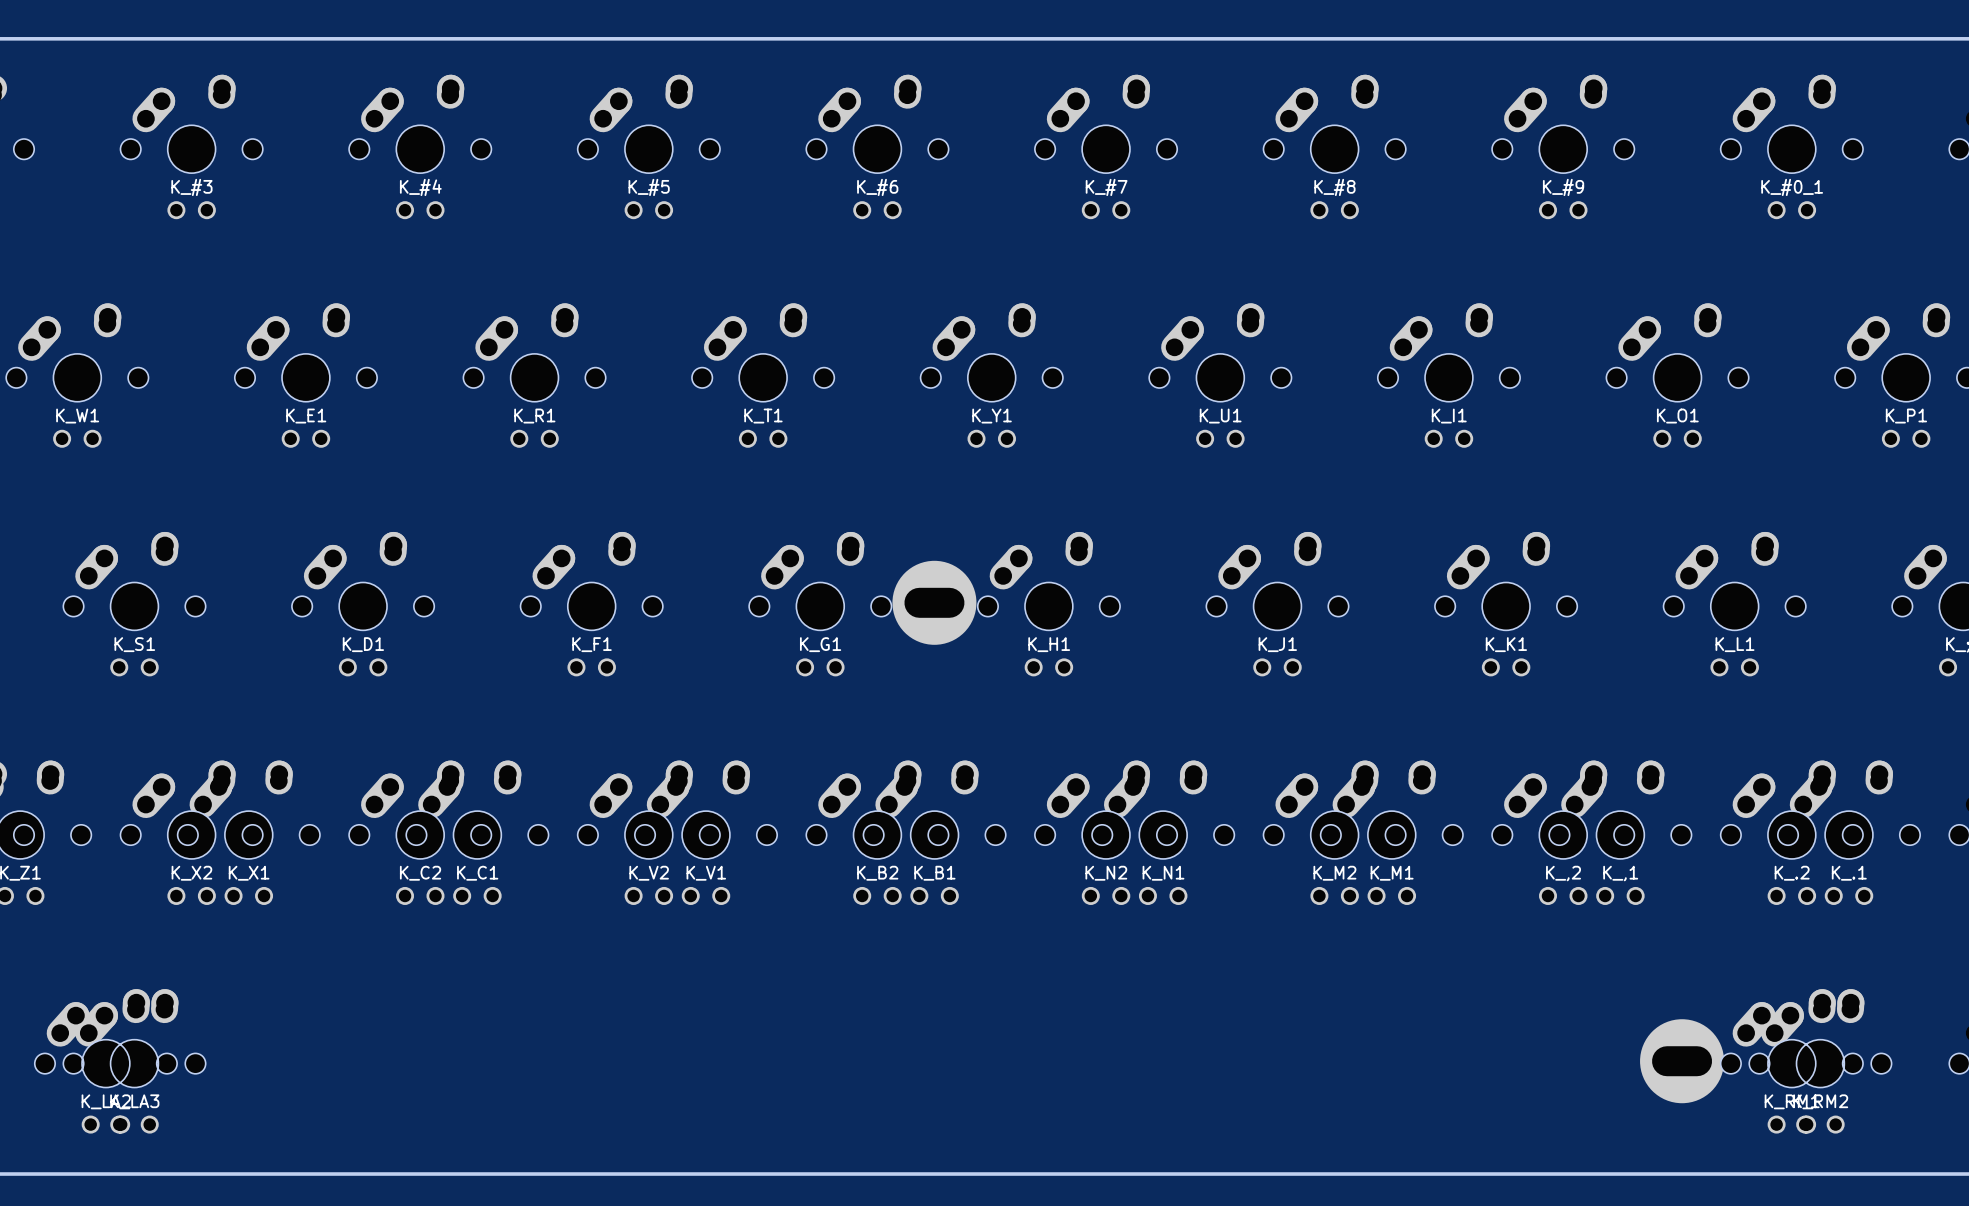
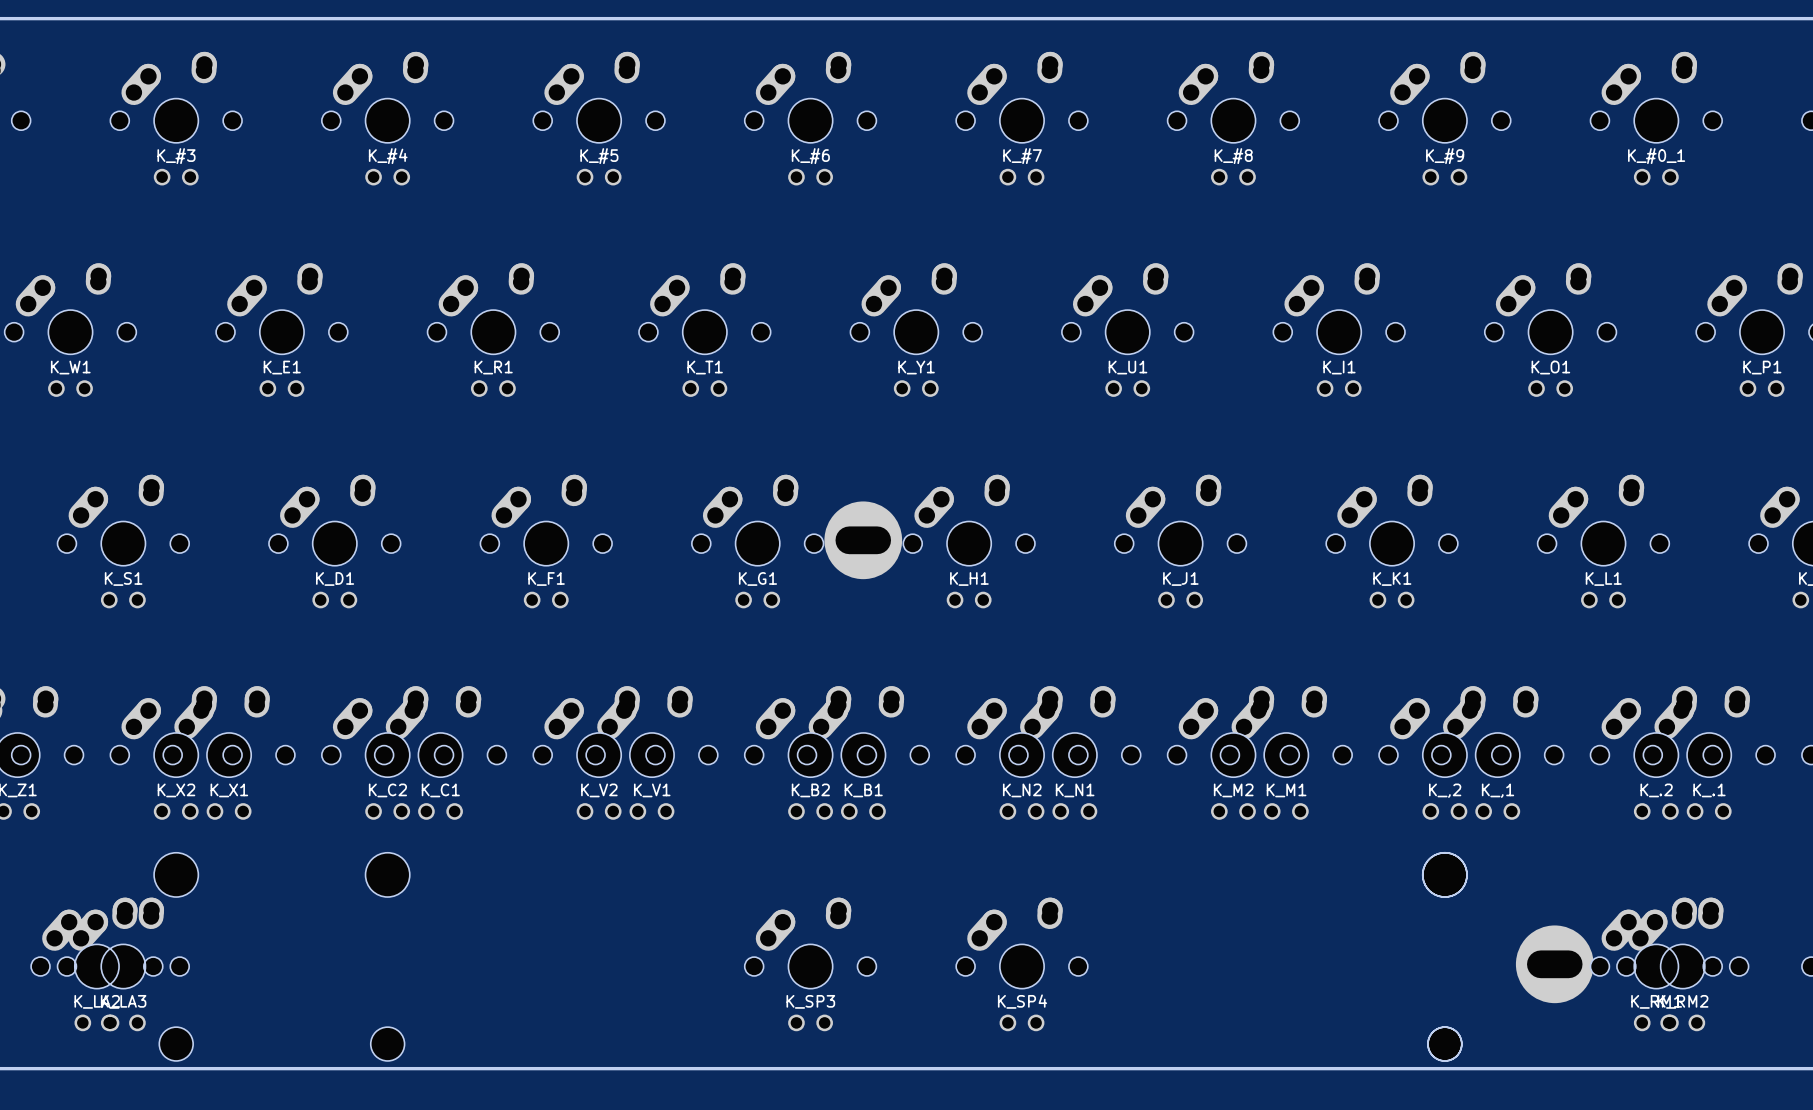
K_SP3: none -> (810, 956)
K_SP4: none -> (916, 956)

